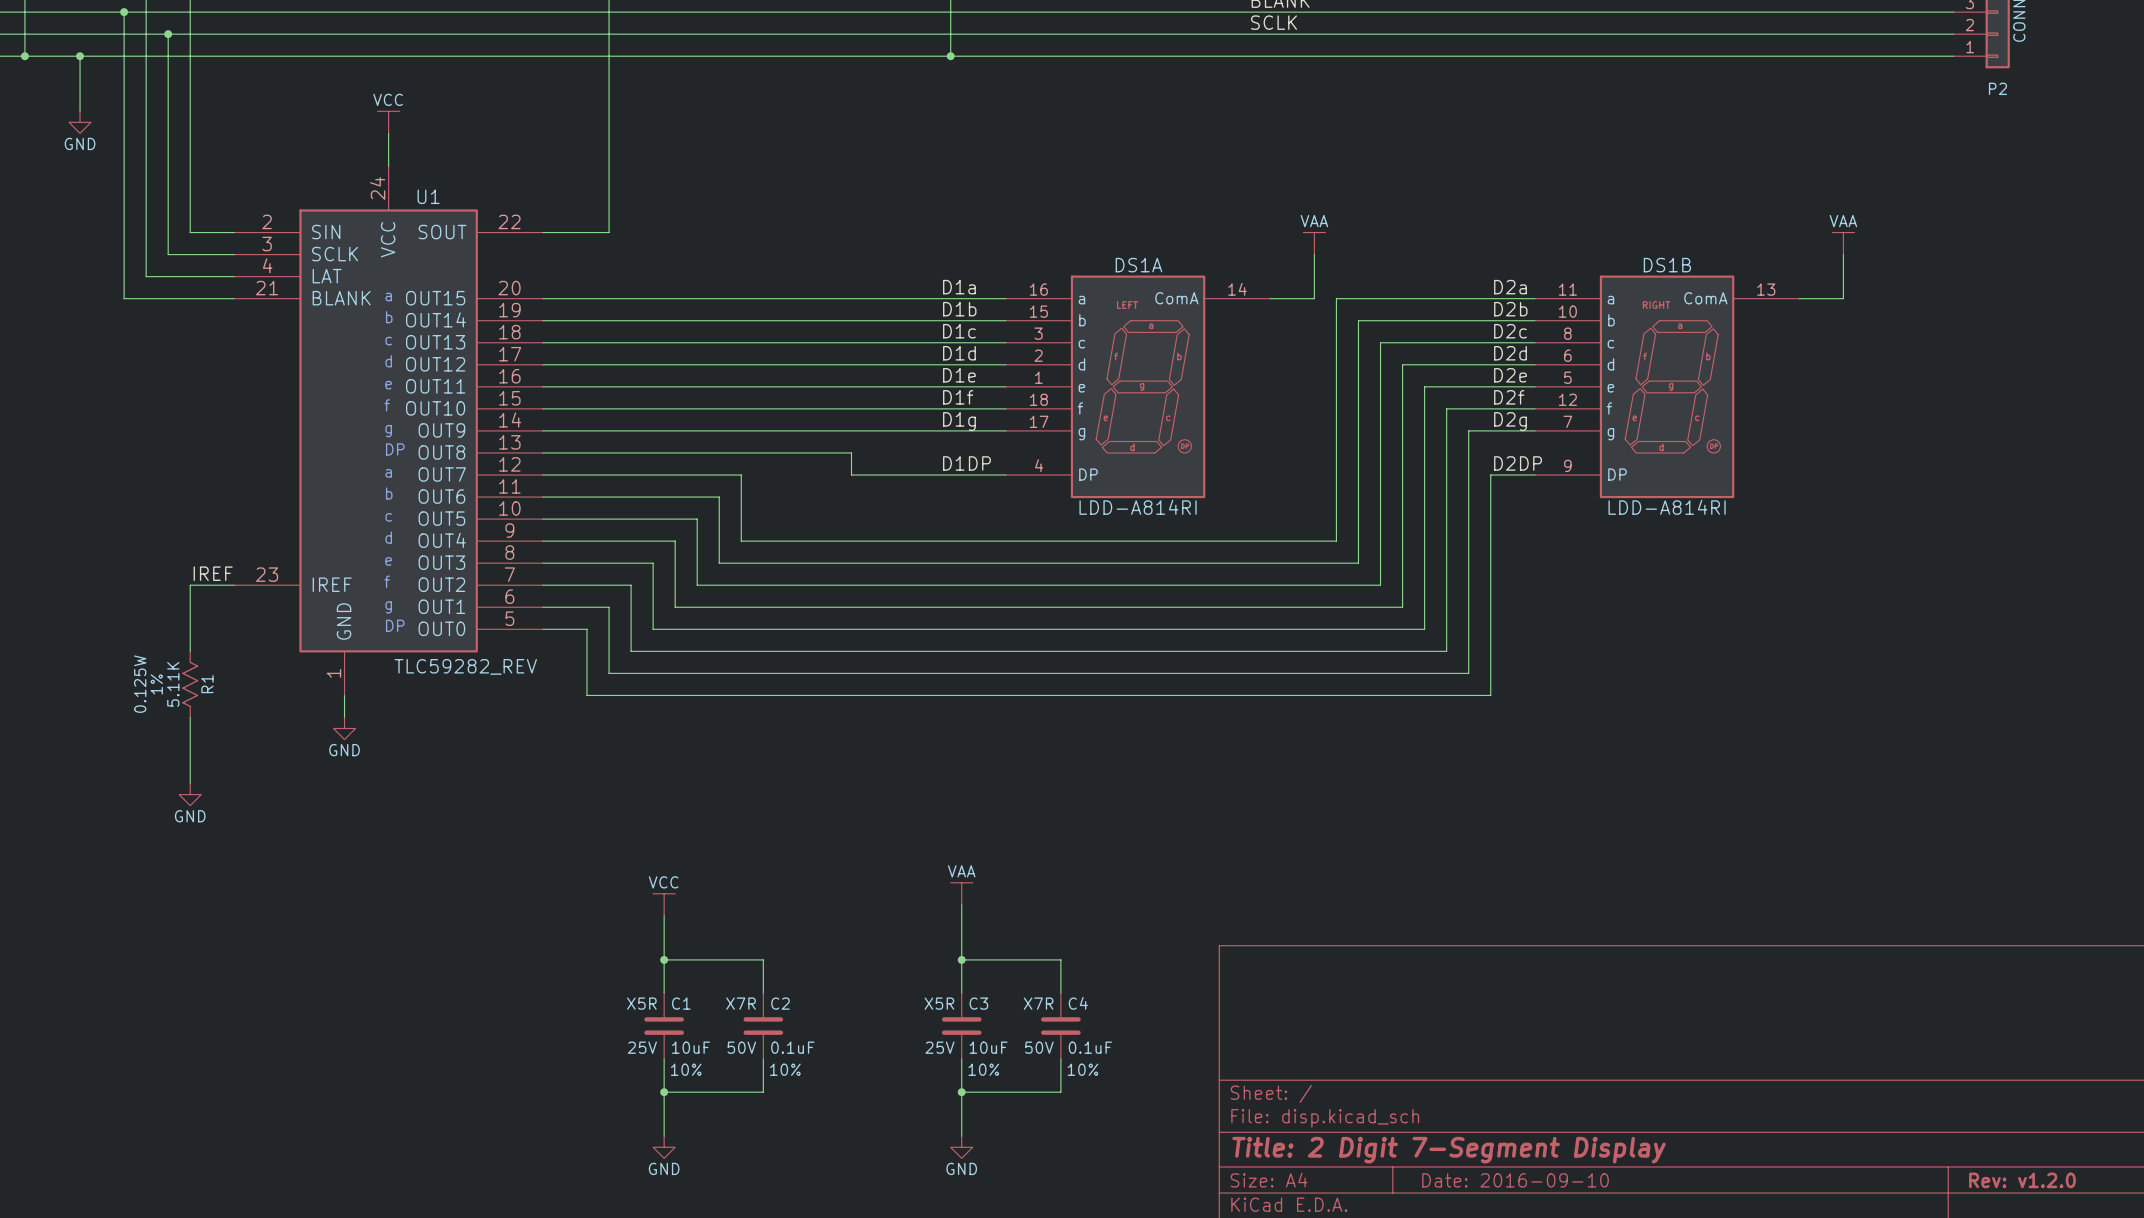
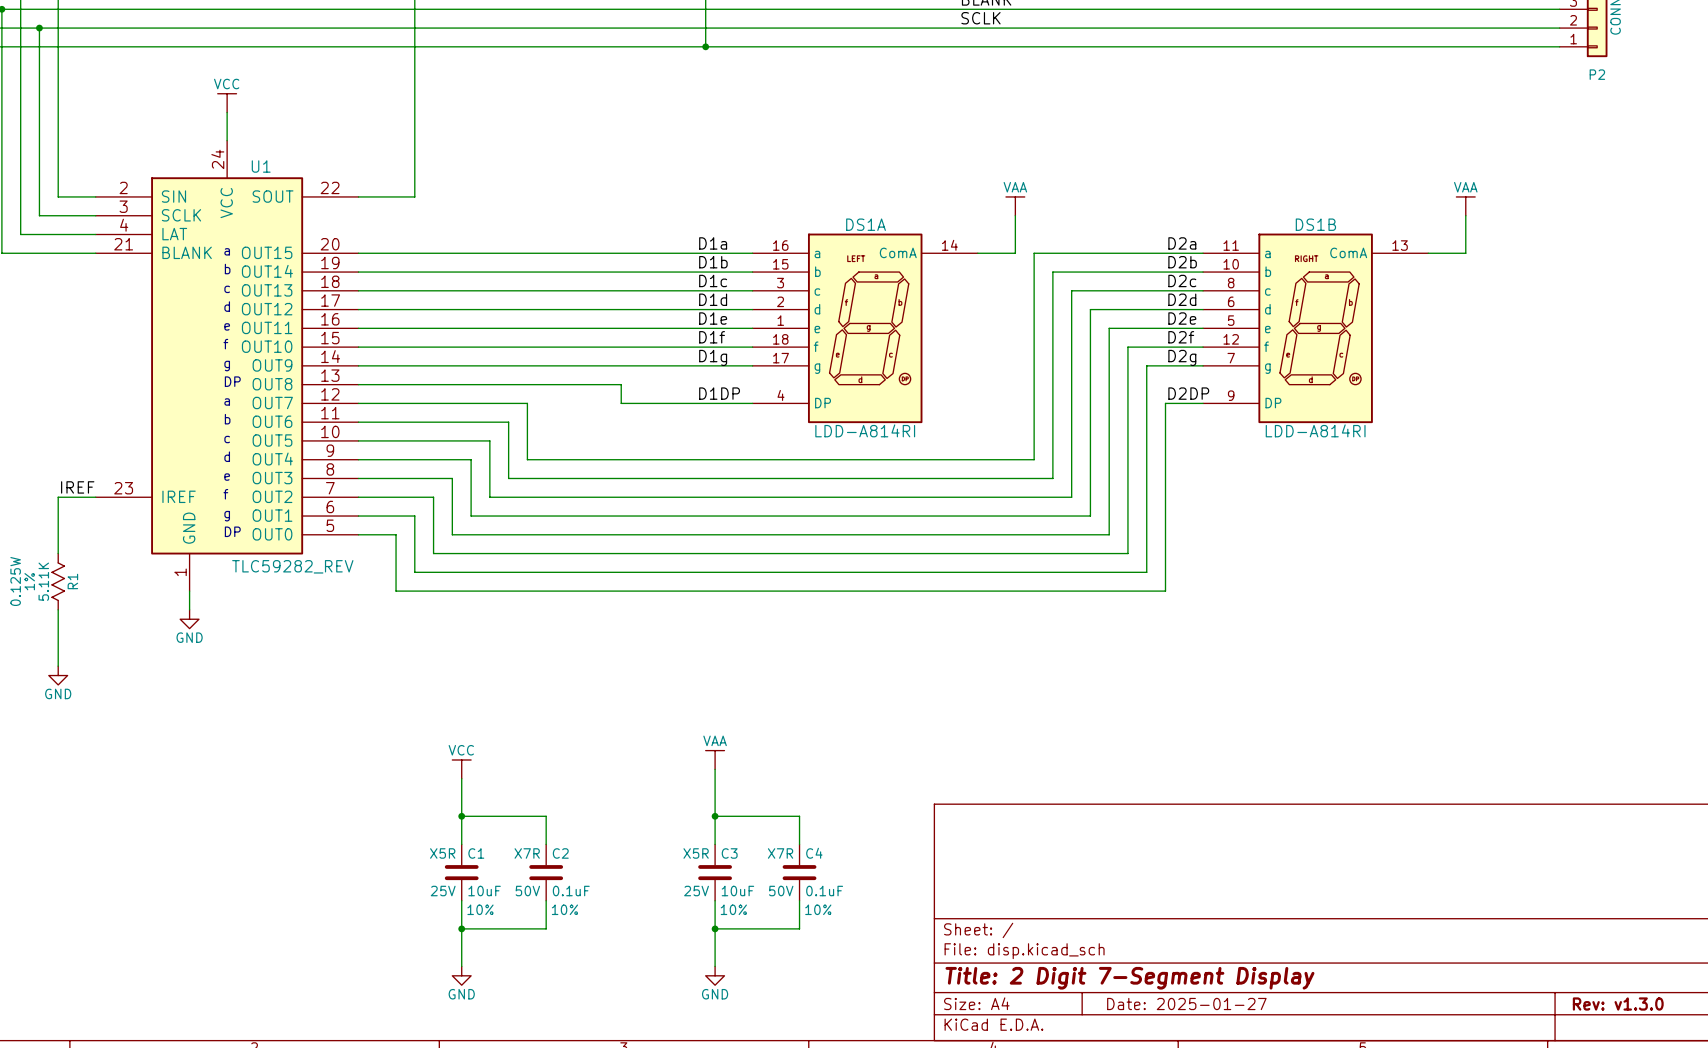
title block: Date: 2016-09-10 (1515, 1180) -> Date: 2025-01-27 (1186, 1004)
title block: Rev: v1.2.0 (2022, 1180) -> Rev: v1.3.0 (1618, 1004)

